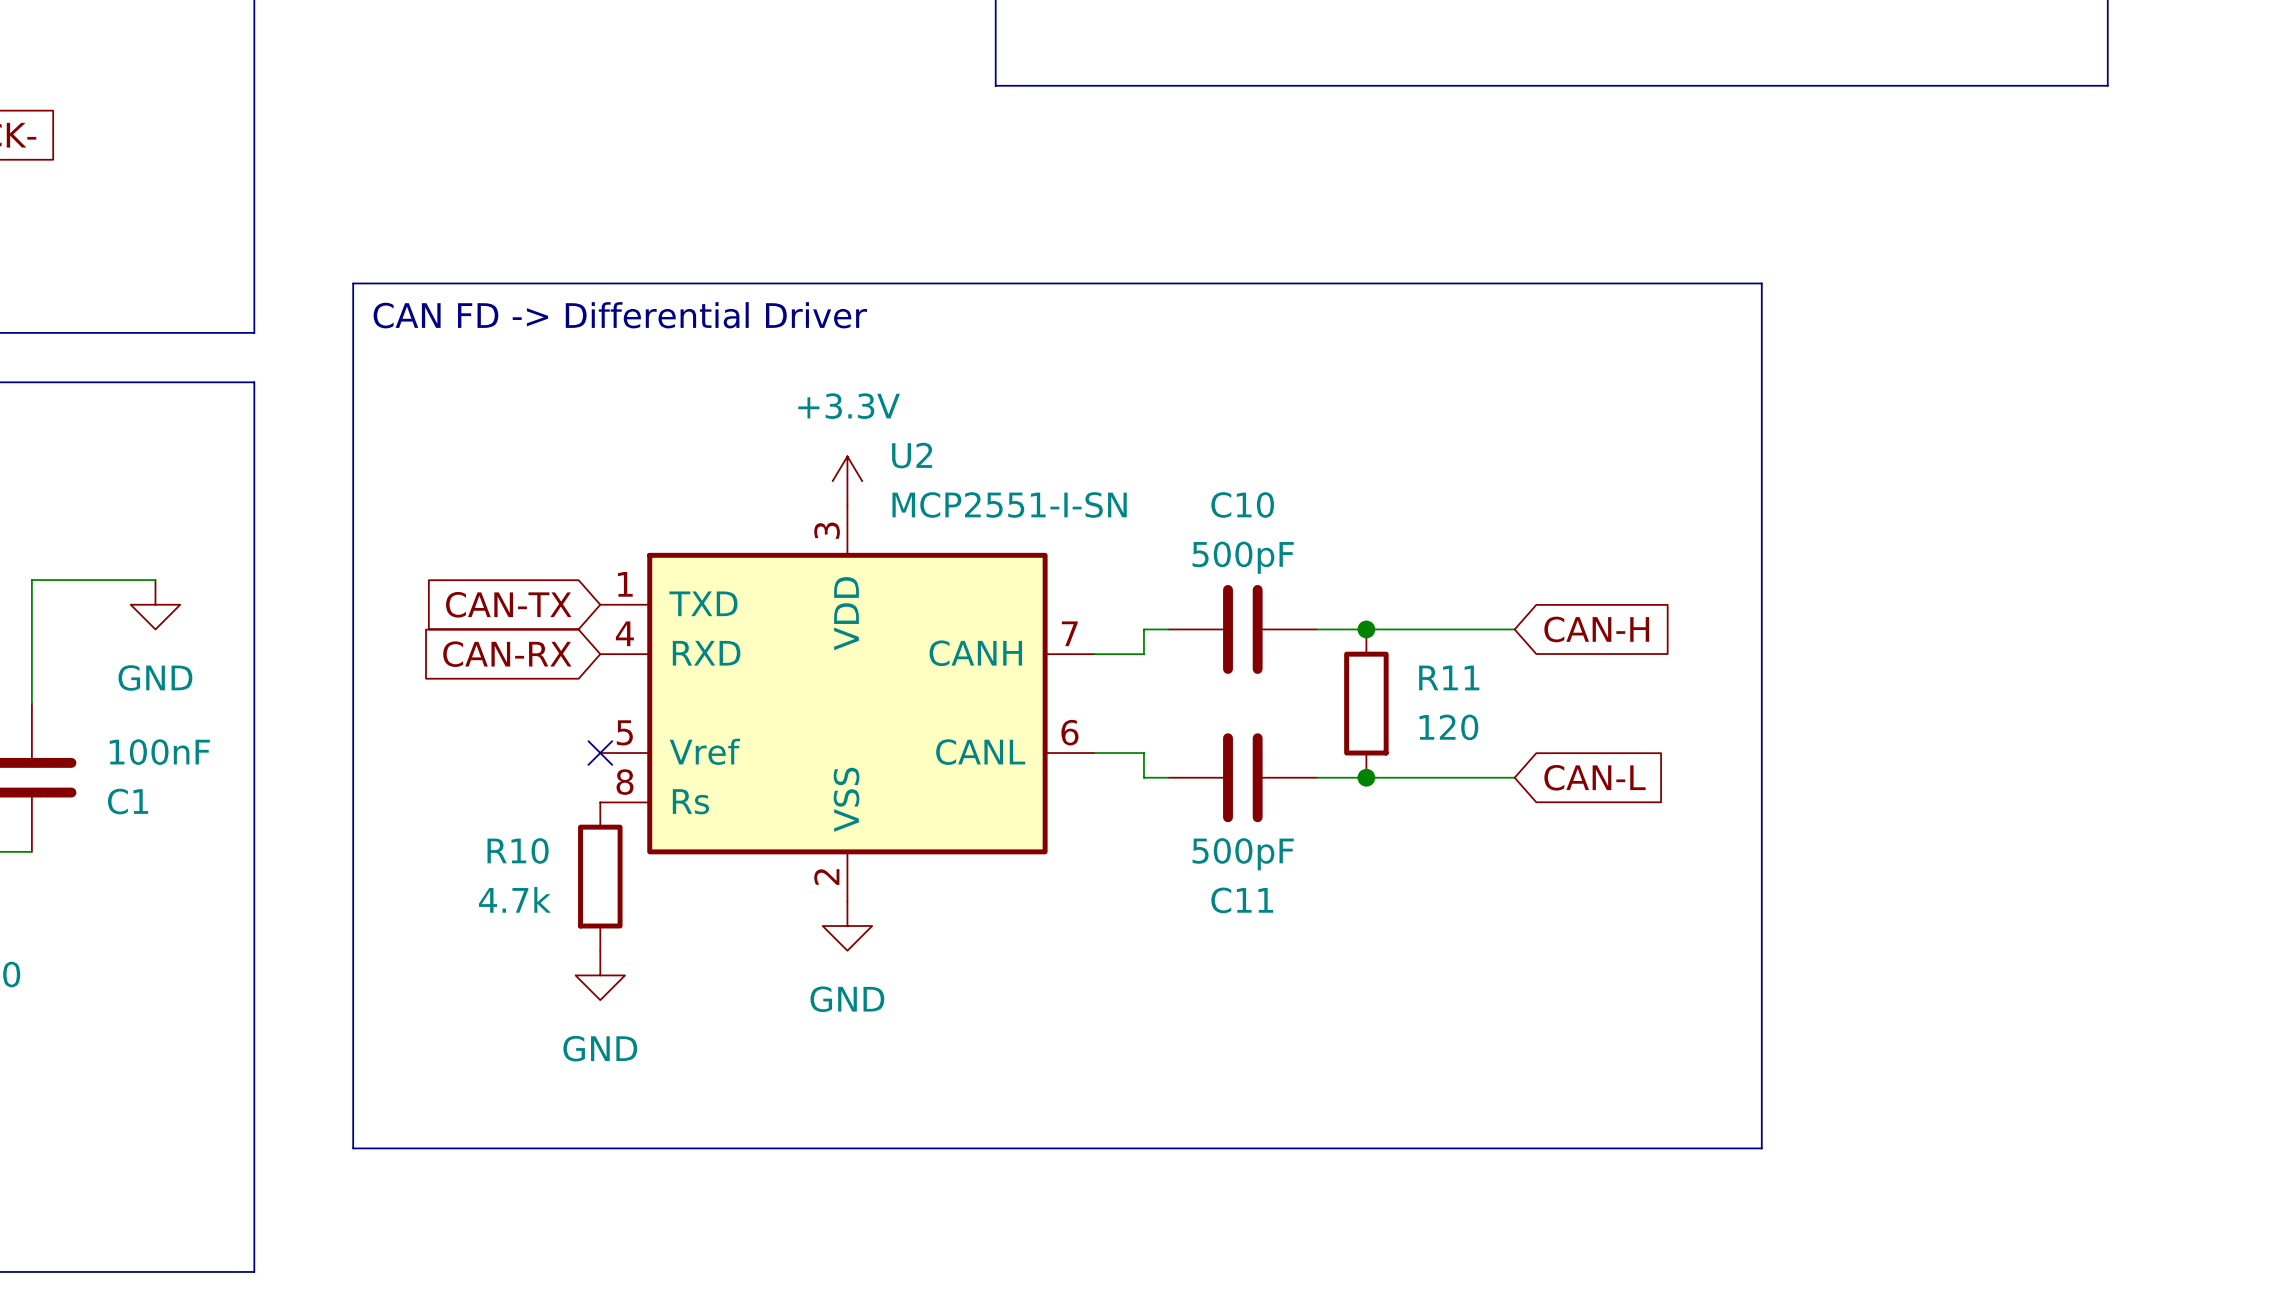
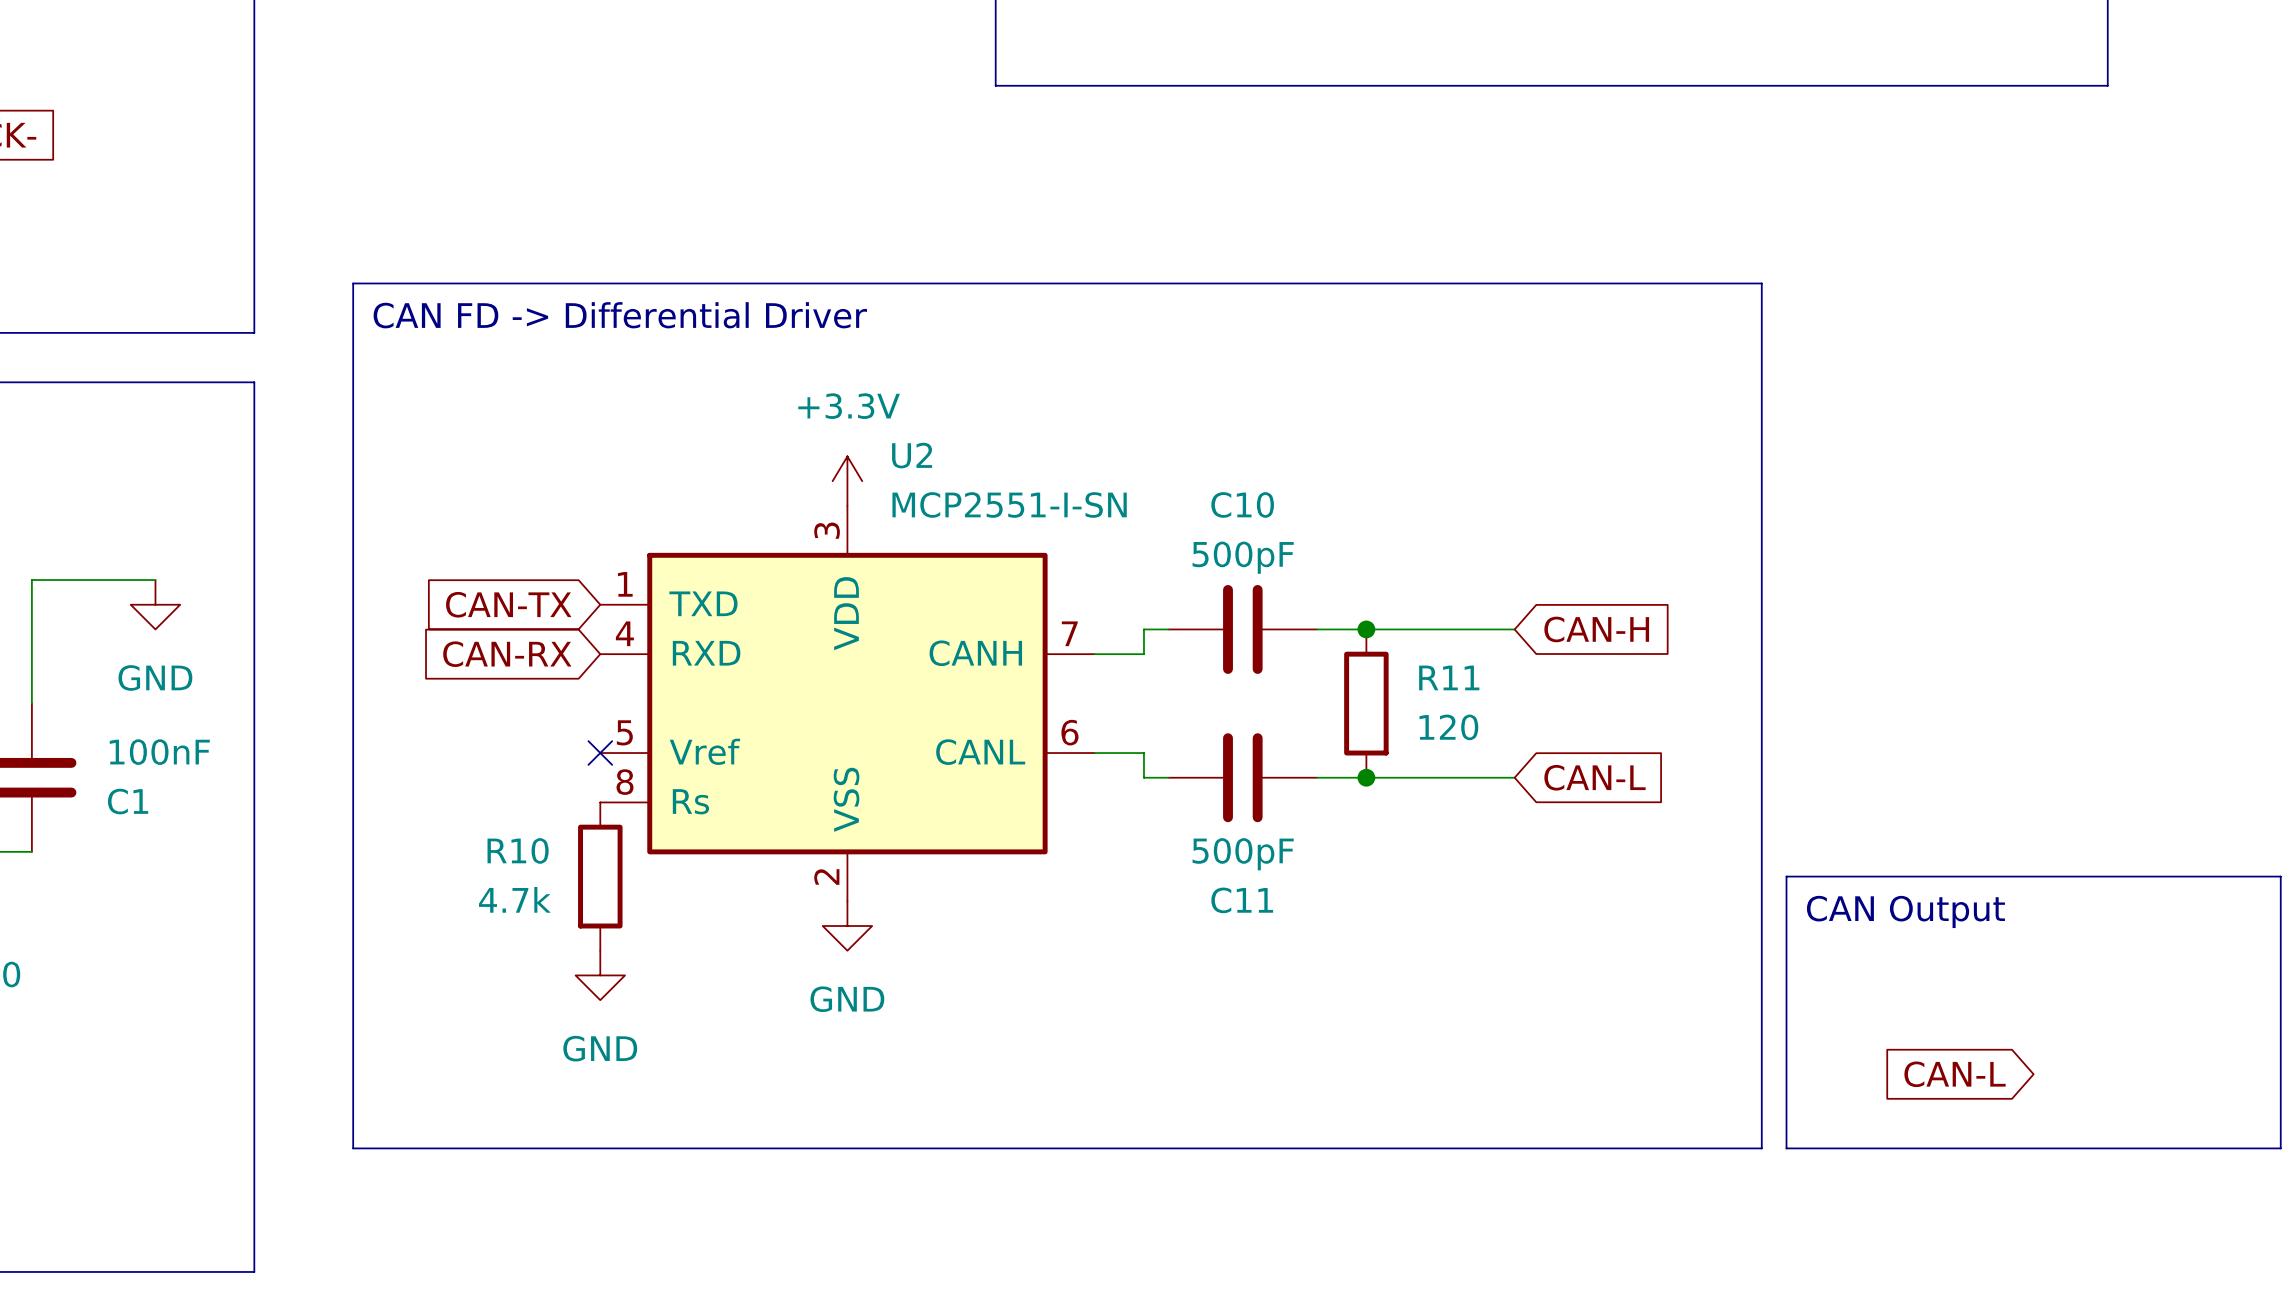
line: none -> (1786, 876) (2280, 876) (2280, 1148) (1786, 1148) (1786, 876)
text: none -> CAN Output (1905, 911)
global label: none -> CAN-L (1955, 1074)

